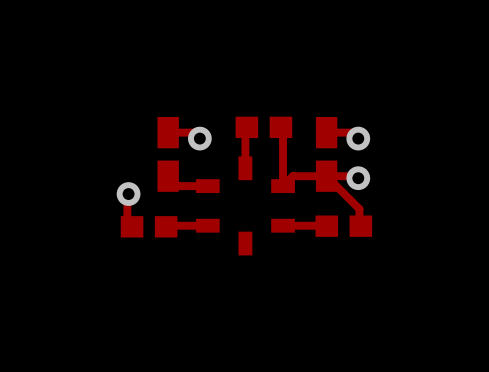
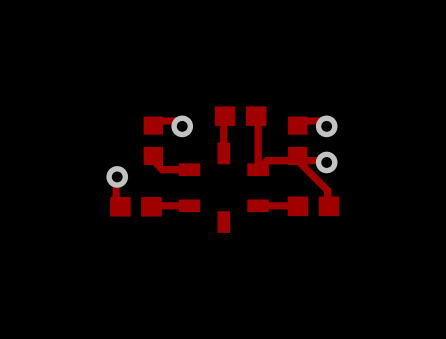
part footprint: [157, 117, 179, 192] -> [143, 116, 164, 166]
part footprint: [315, 117, 338, 192] -> [288, 116, 308, 166]

